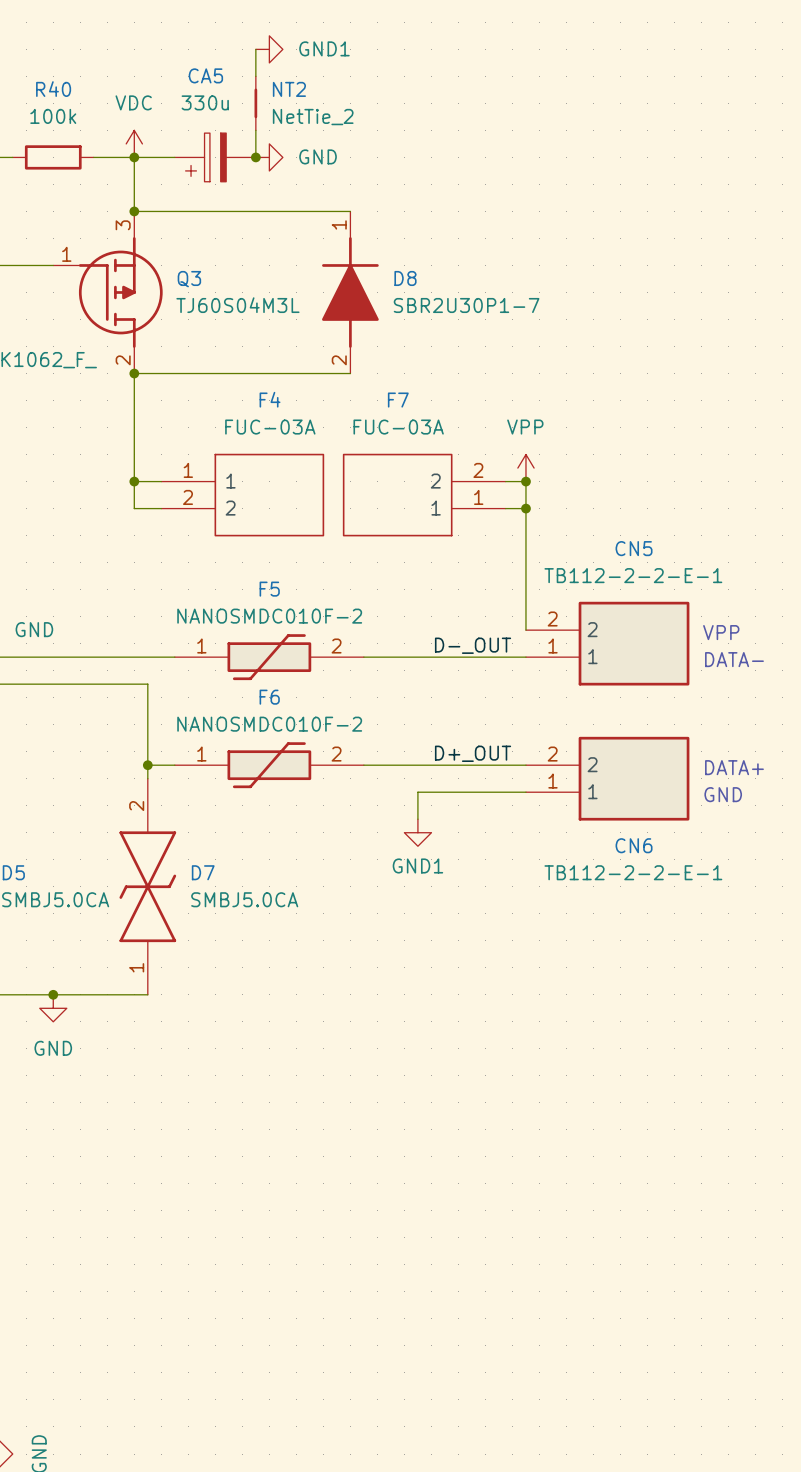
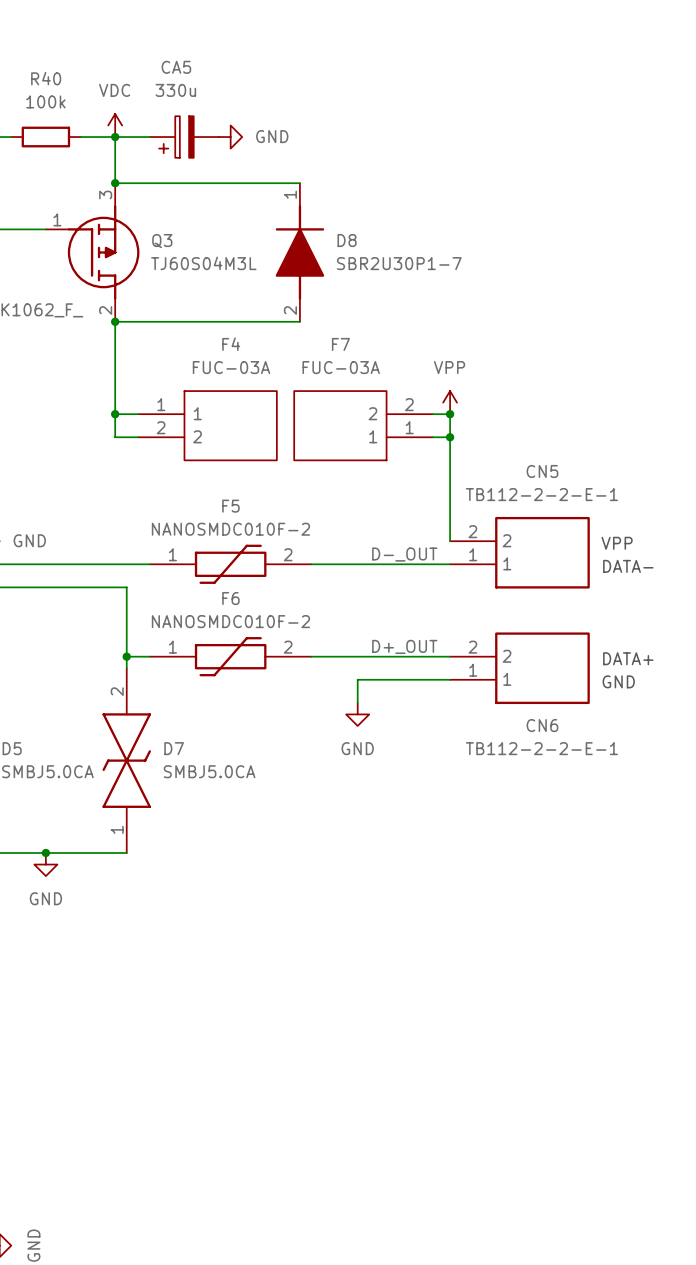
wire: (255, 49) (255, 76) -> none
power symbol: GND1 (269, 49) -> none
NT2: NetTie_2 (255, 103) -> none
wire: (255, 130) (255, 157) -> none
junction: (255, 157) -> none
power symbol: GND1 (417, 832) -> GND (357, 714)

